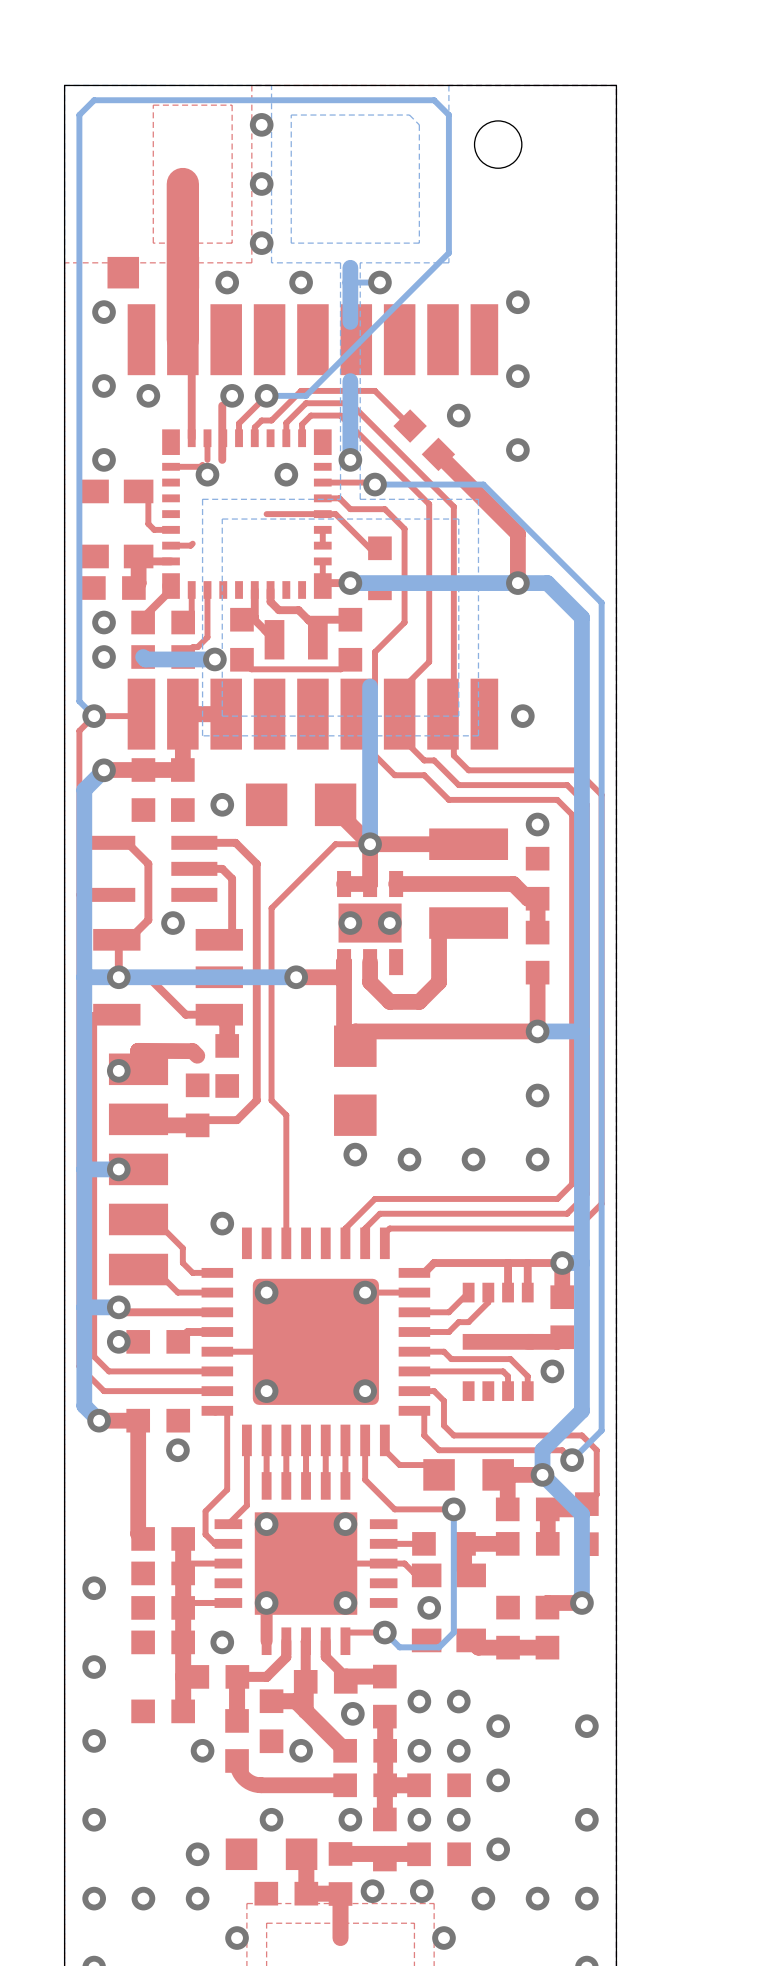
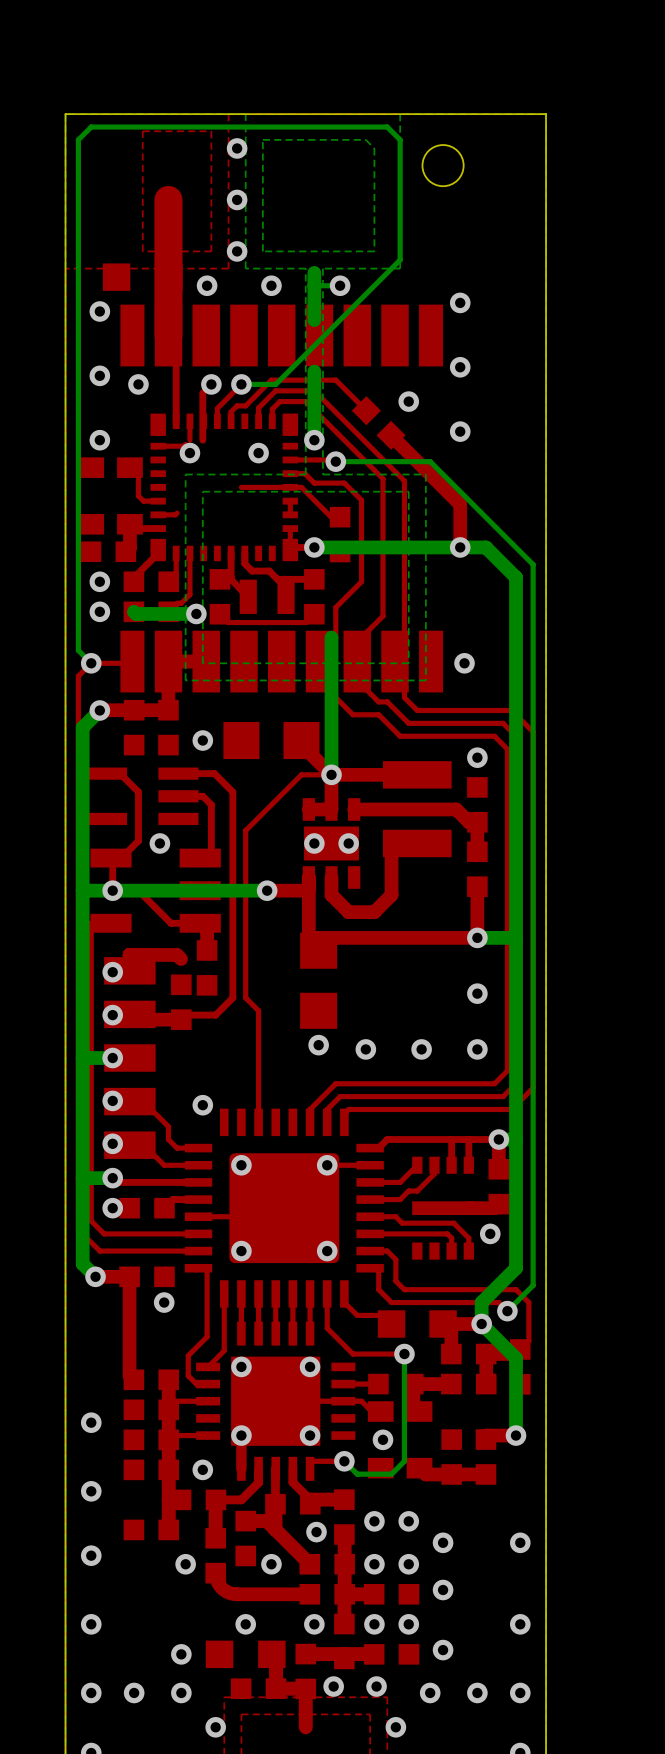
via: none -> (112, 1015)
via: none -> (112, 1100)
via: none -> (112, 1143)

